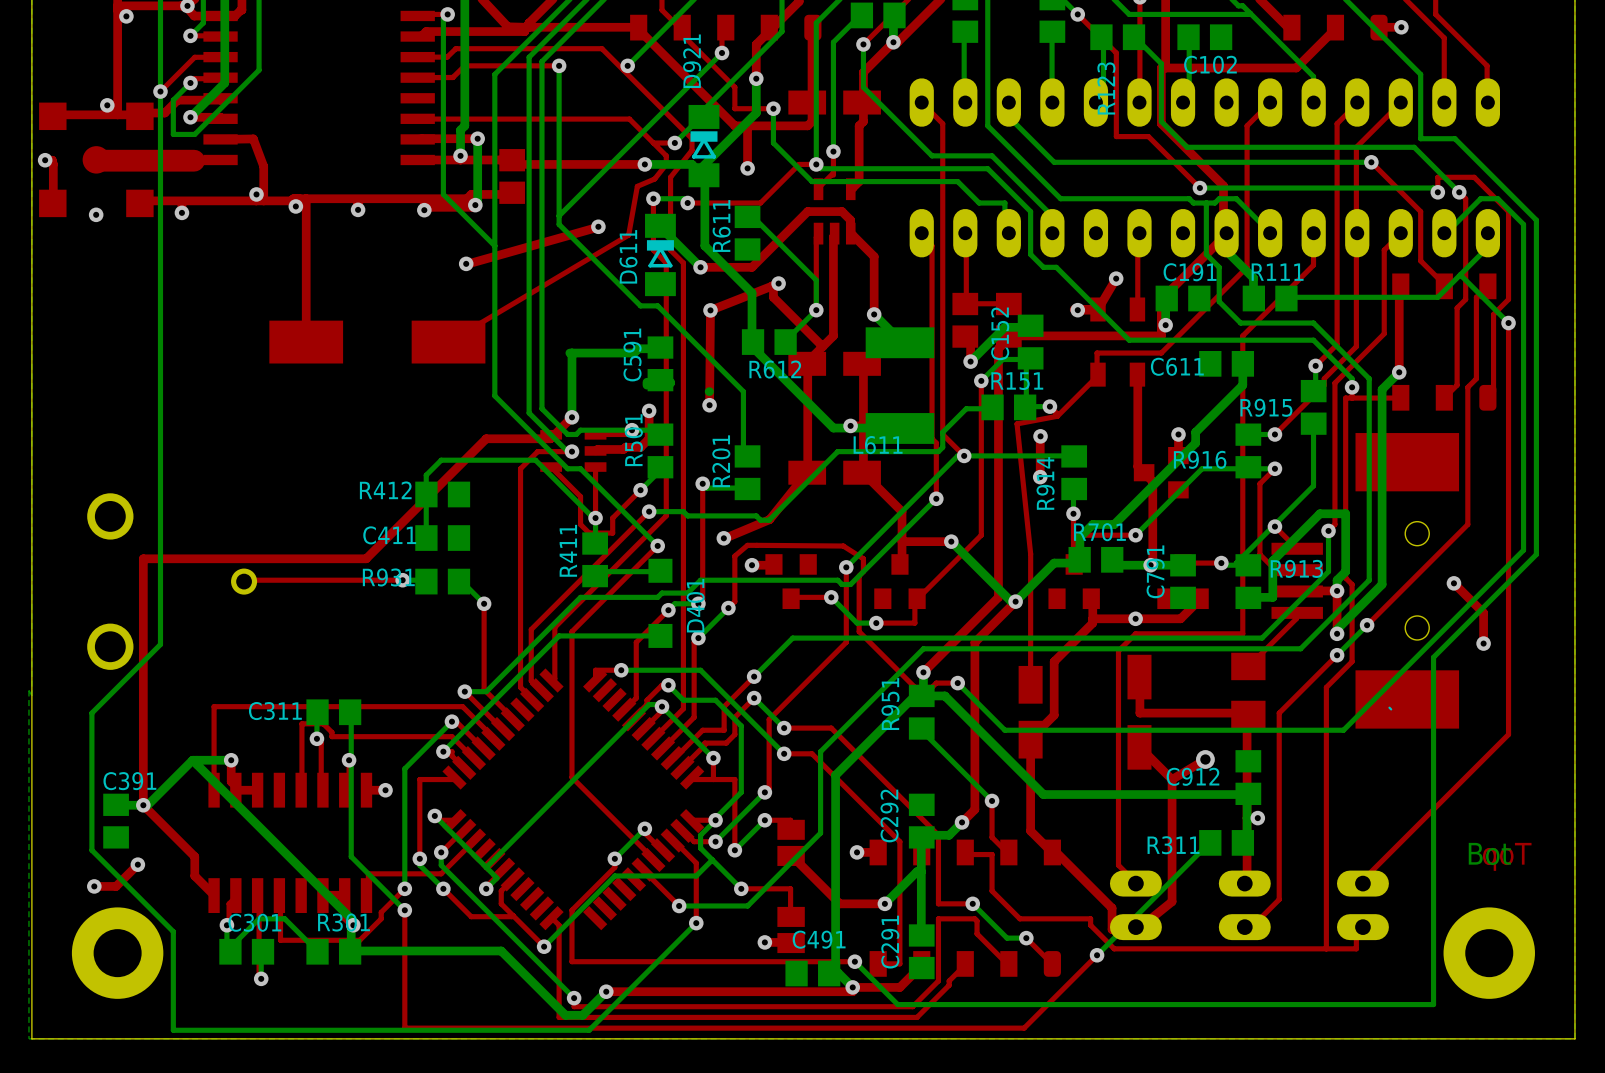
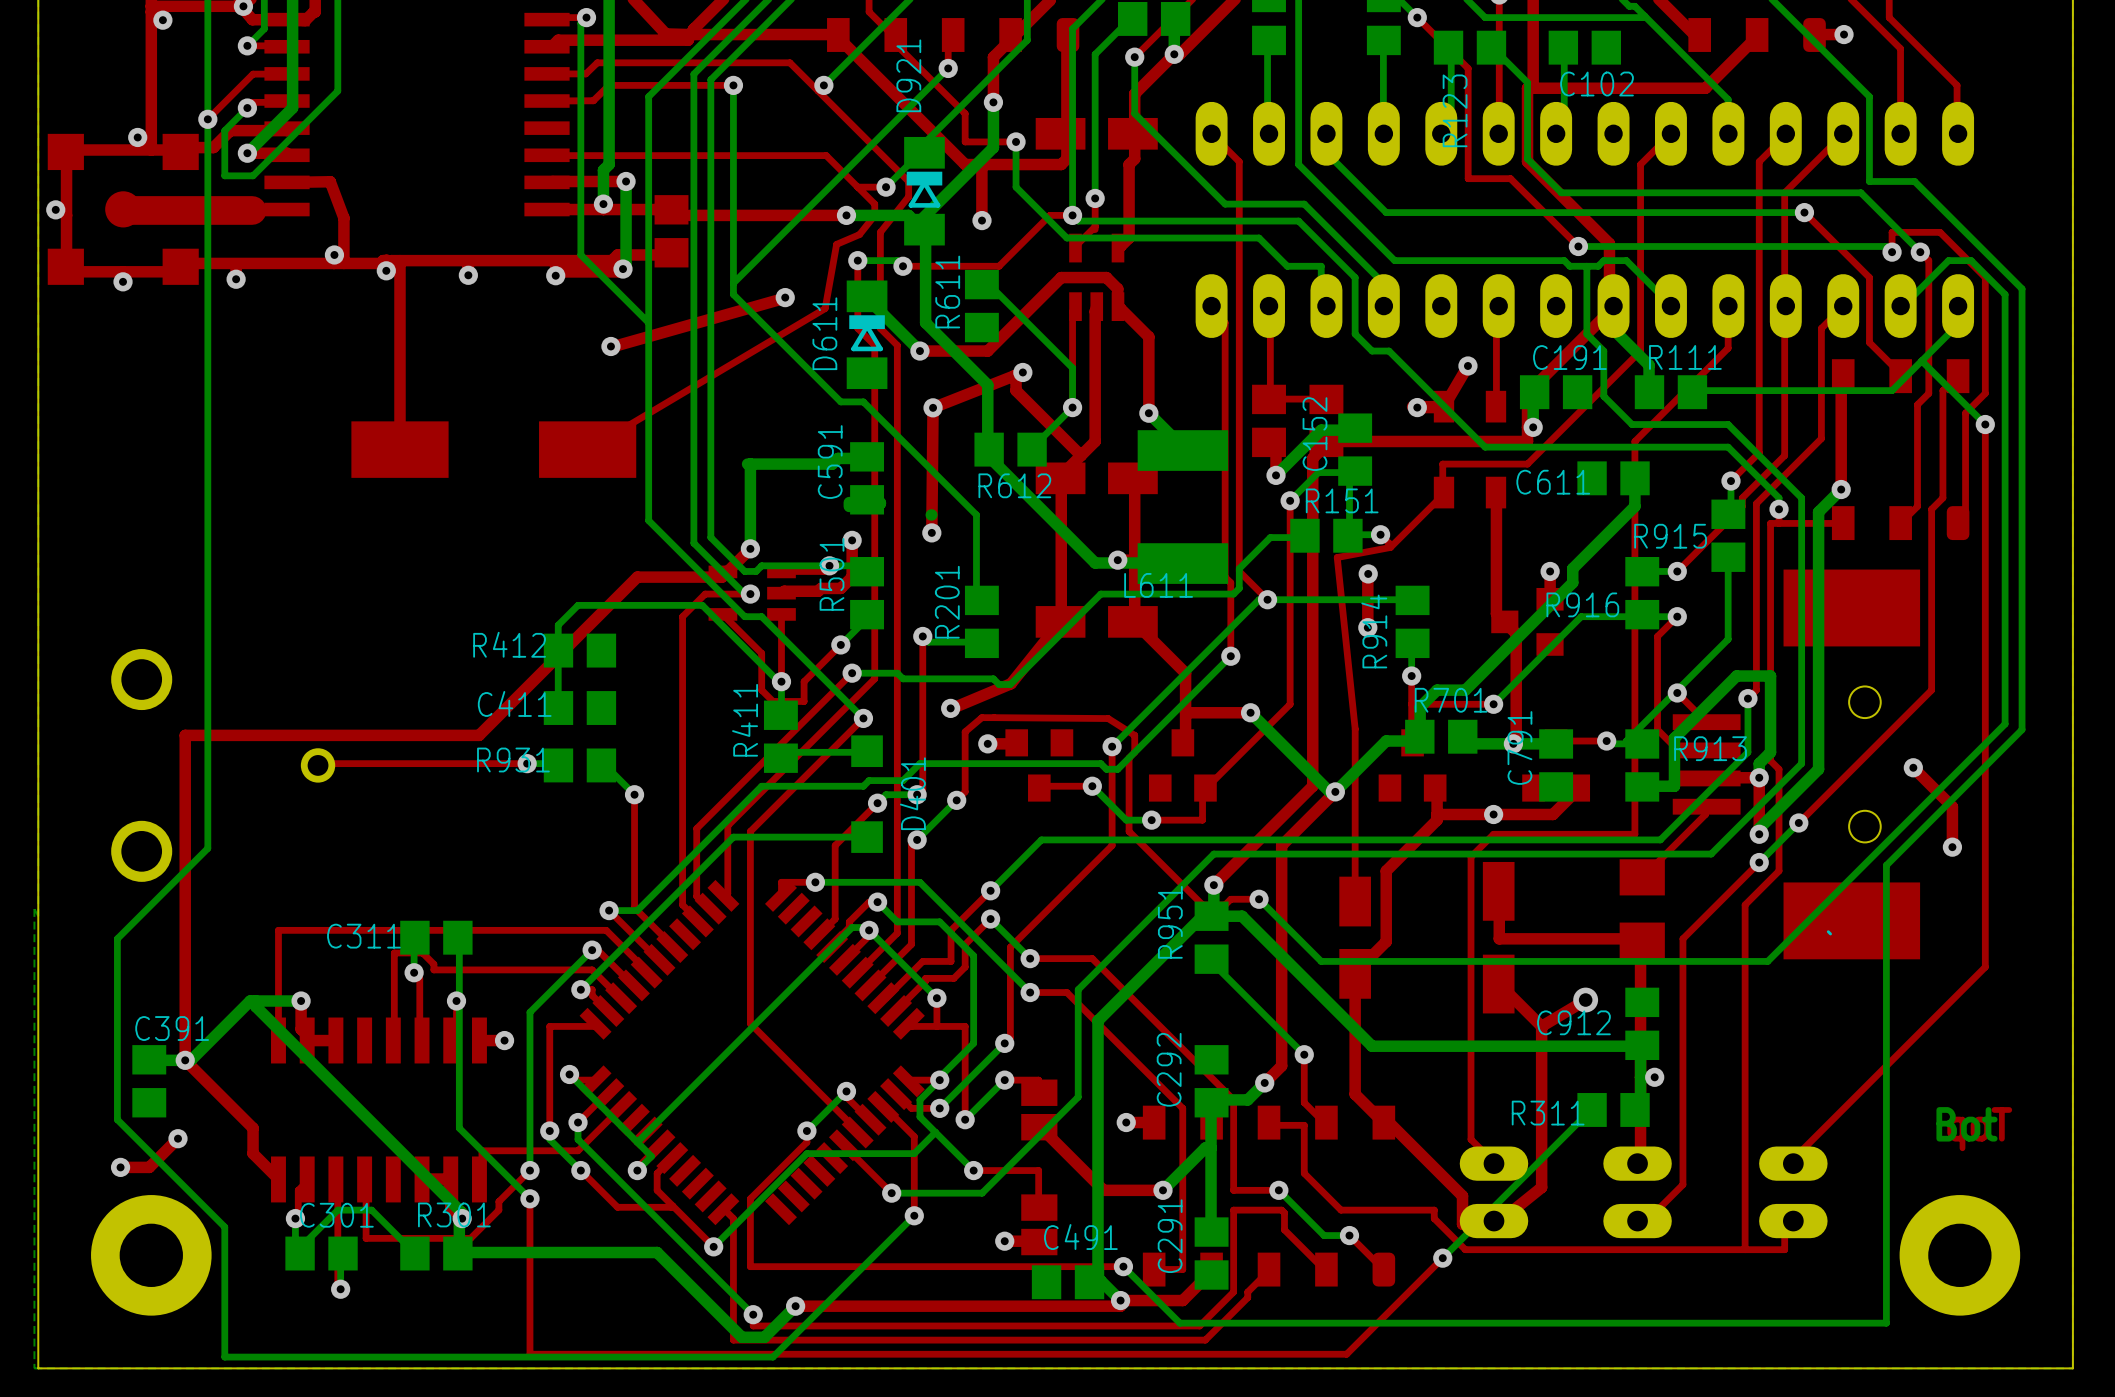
top track: none -> (65, 151) (66, 215)
top track: none -> (65, 266) (65, 271) (178, 271) (177, 266) (180, 266)

